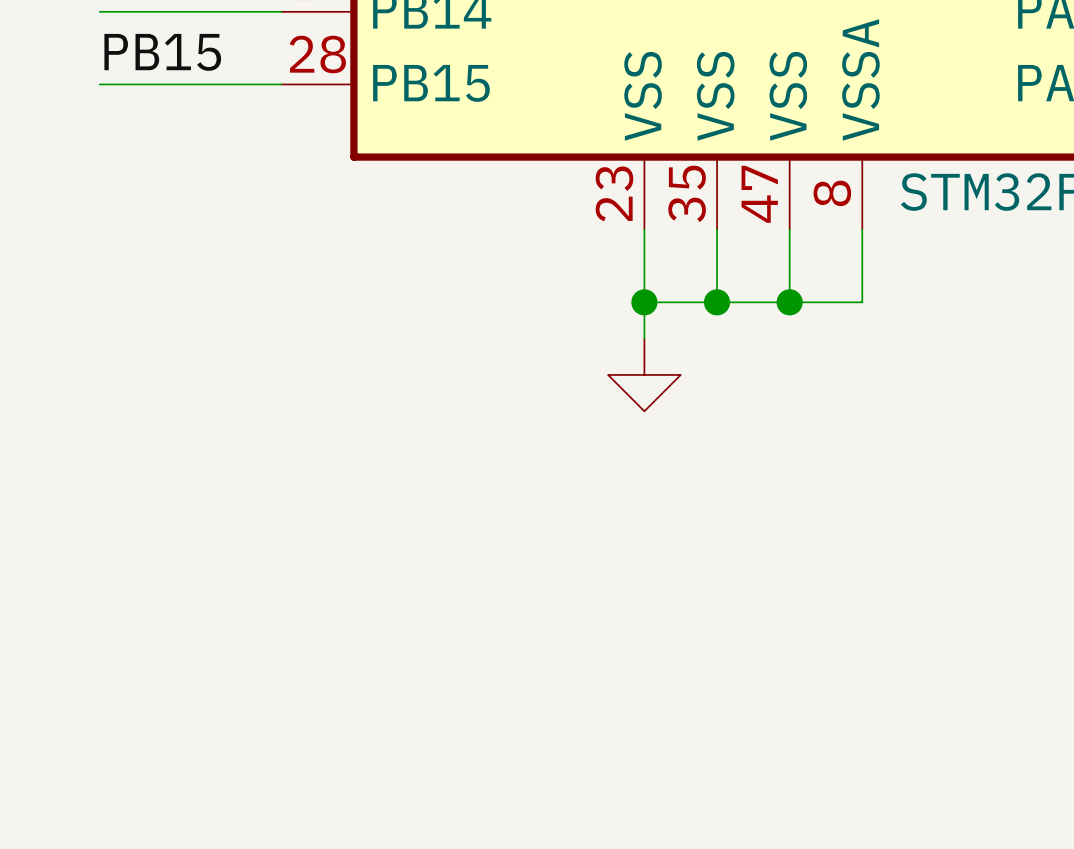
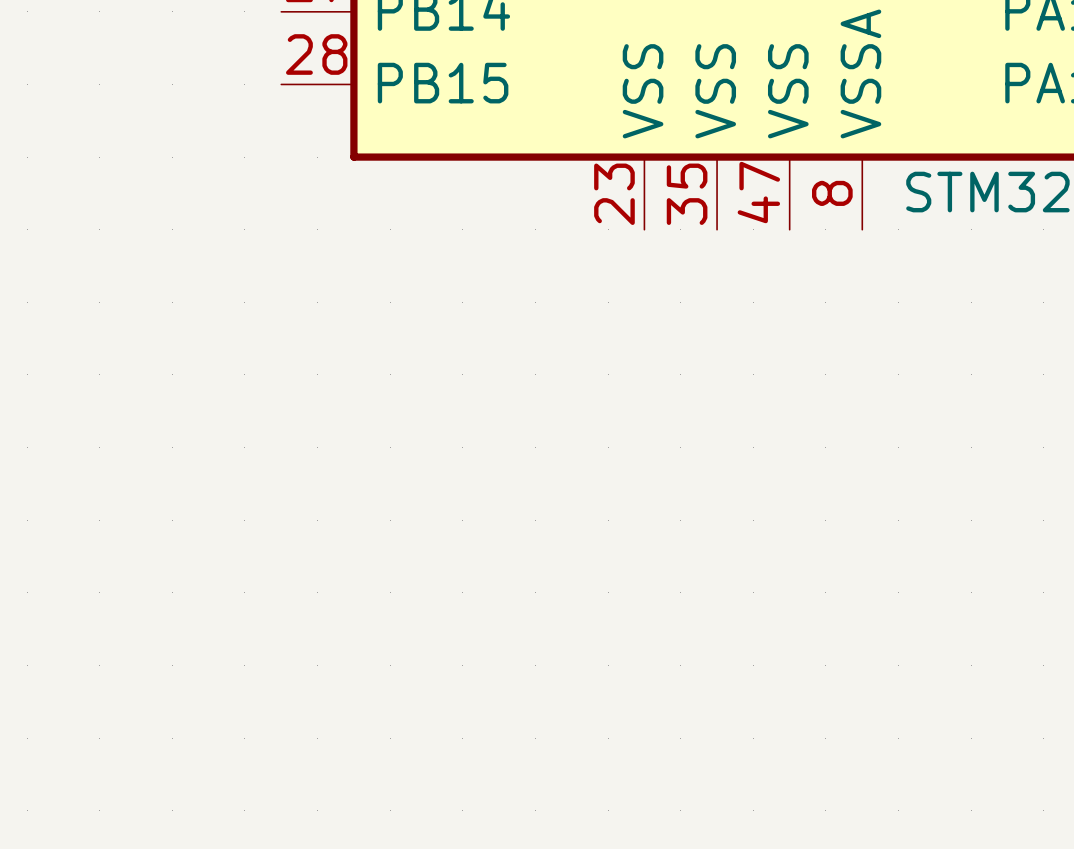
wire: (99, 11) (281, 11) -> none
label: PB15 (162, 52) -> none
wire: (99, 84) (281, 84) -> none
wire: (644, 229) (644, 338) -> none
wire: (717, 229) (717, 302) -> none
wire: (789, 229) (789, 302) -> none
wire: (862, 229) (862, 302) (644, 302) -> none
junction: (644, 302) -> none
junction: (717, 302) -> none
junction: (789, 302) -> none
power symbol: (644, 374) -> none

